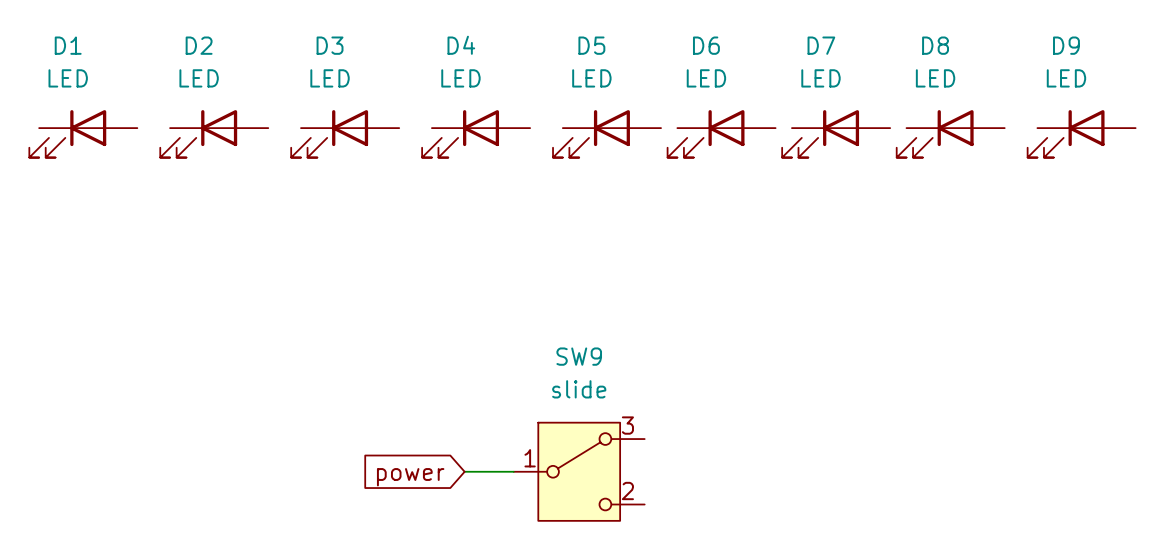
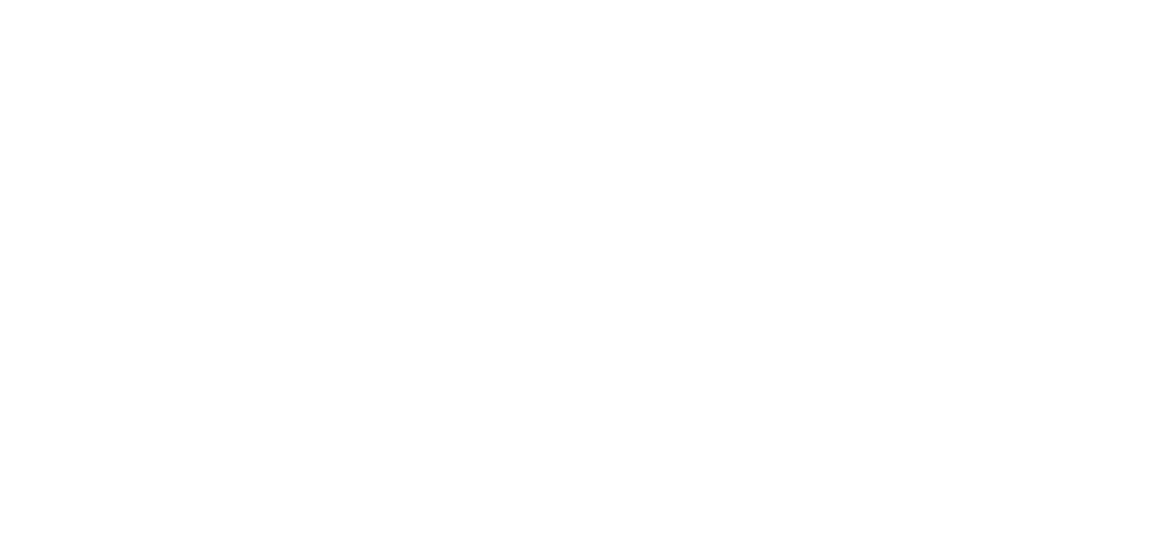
D1: LED (83, 133) -> none
D2: LED (214, 133) -> none
D3: LED (345, 133) -> none
D4: LED (476, 133) -> none
D5: LED (607, 133) -> none
D6: LED (721, 133) -> none
D7: LED (836, 133) -> none
D8: LED (950, 133) -> none
D9: LED (1081, 133) -> none
wire: (464, 471) (513, 471) -> none
SW9: slide (579, 471) -> none
global label: power (410, 477) -> none

